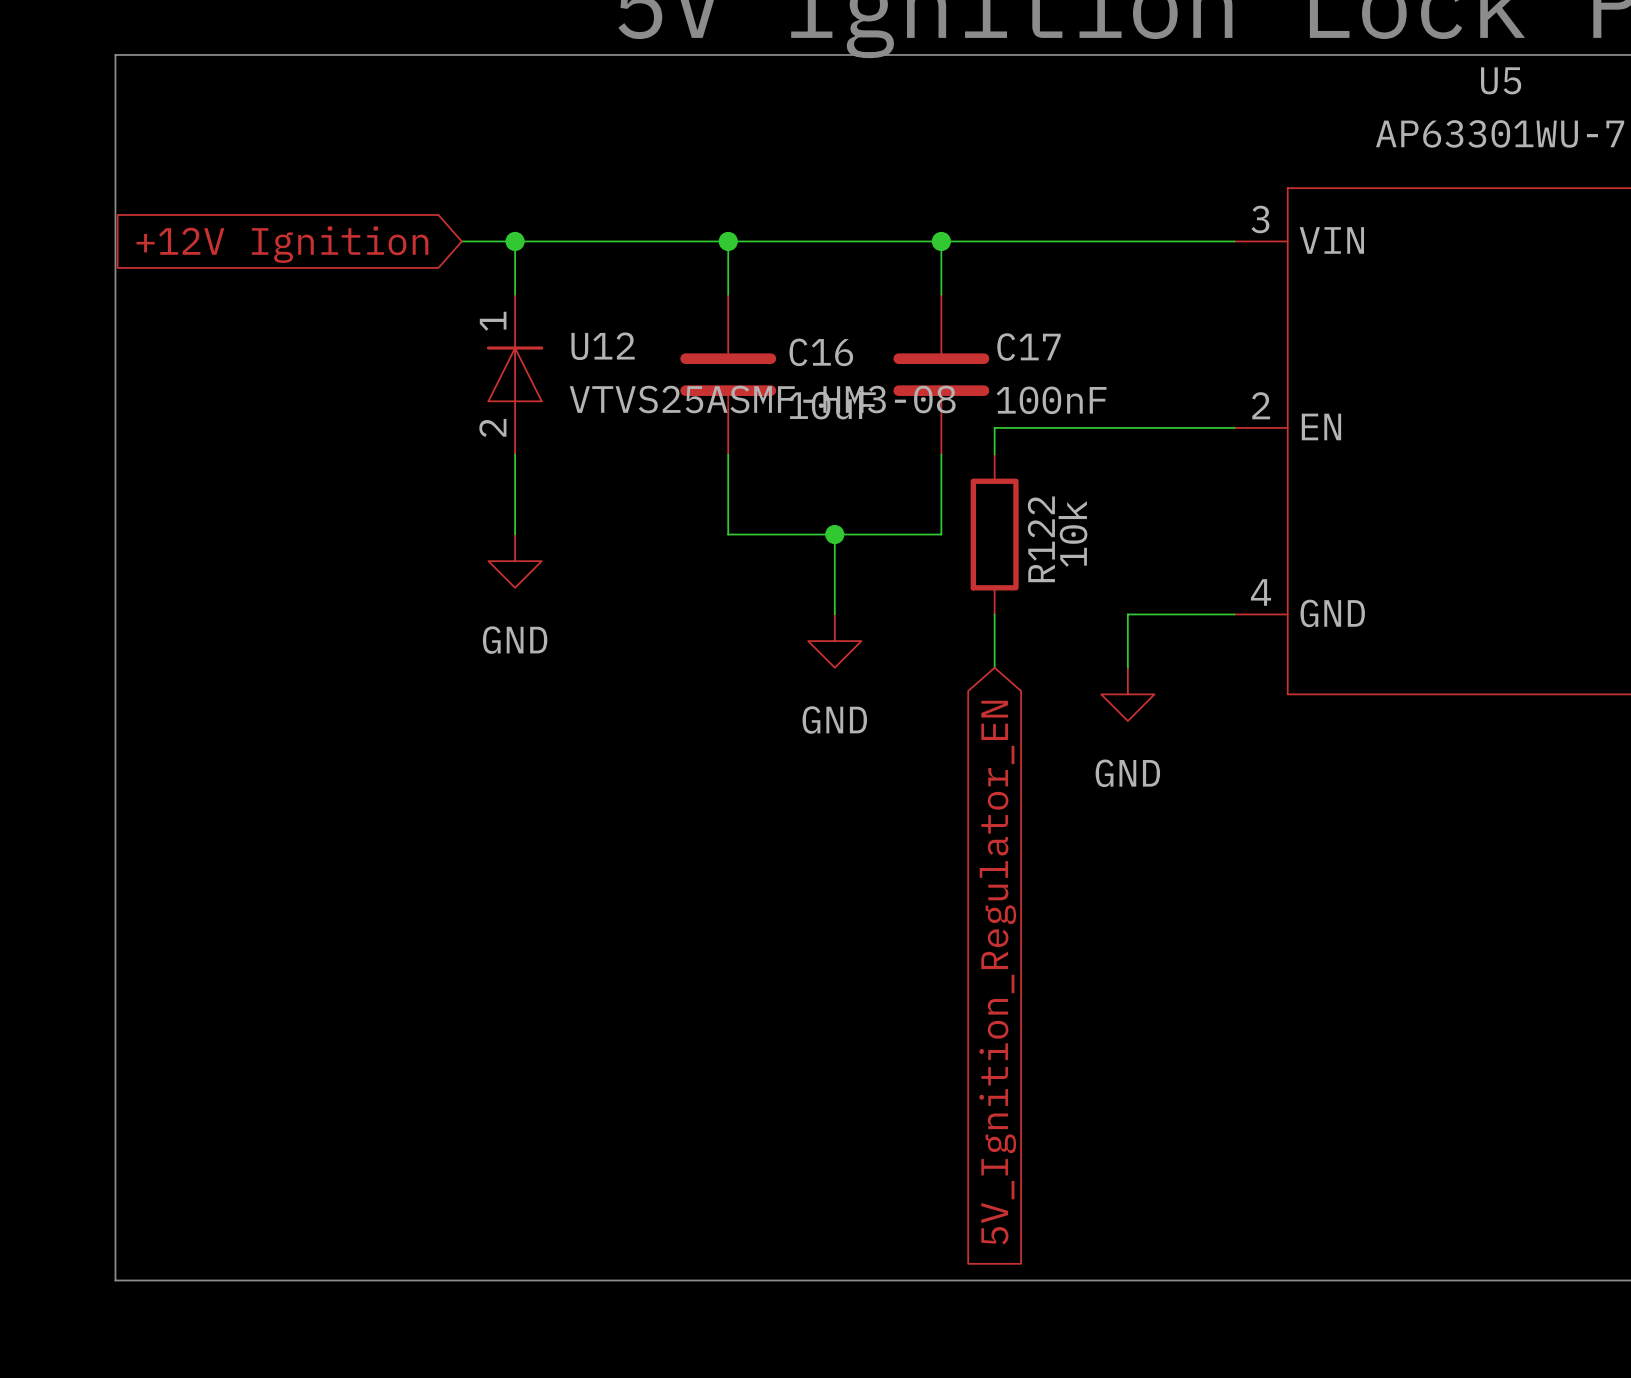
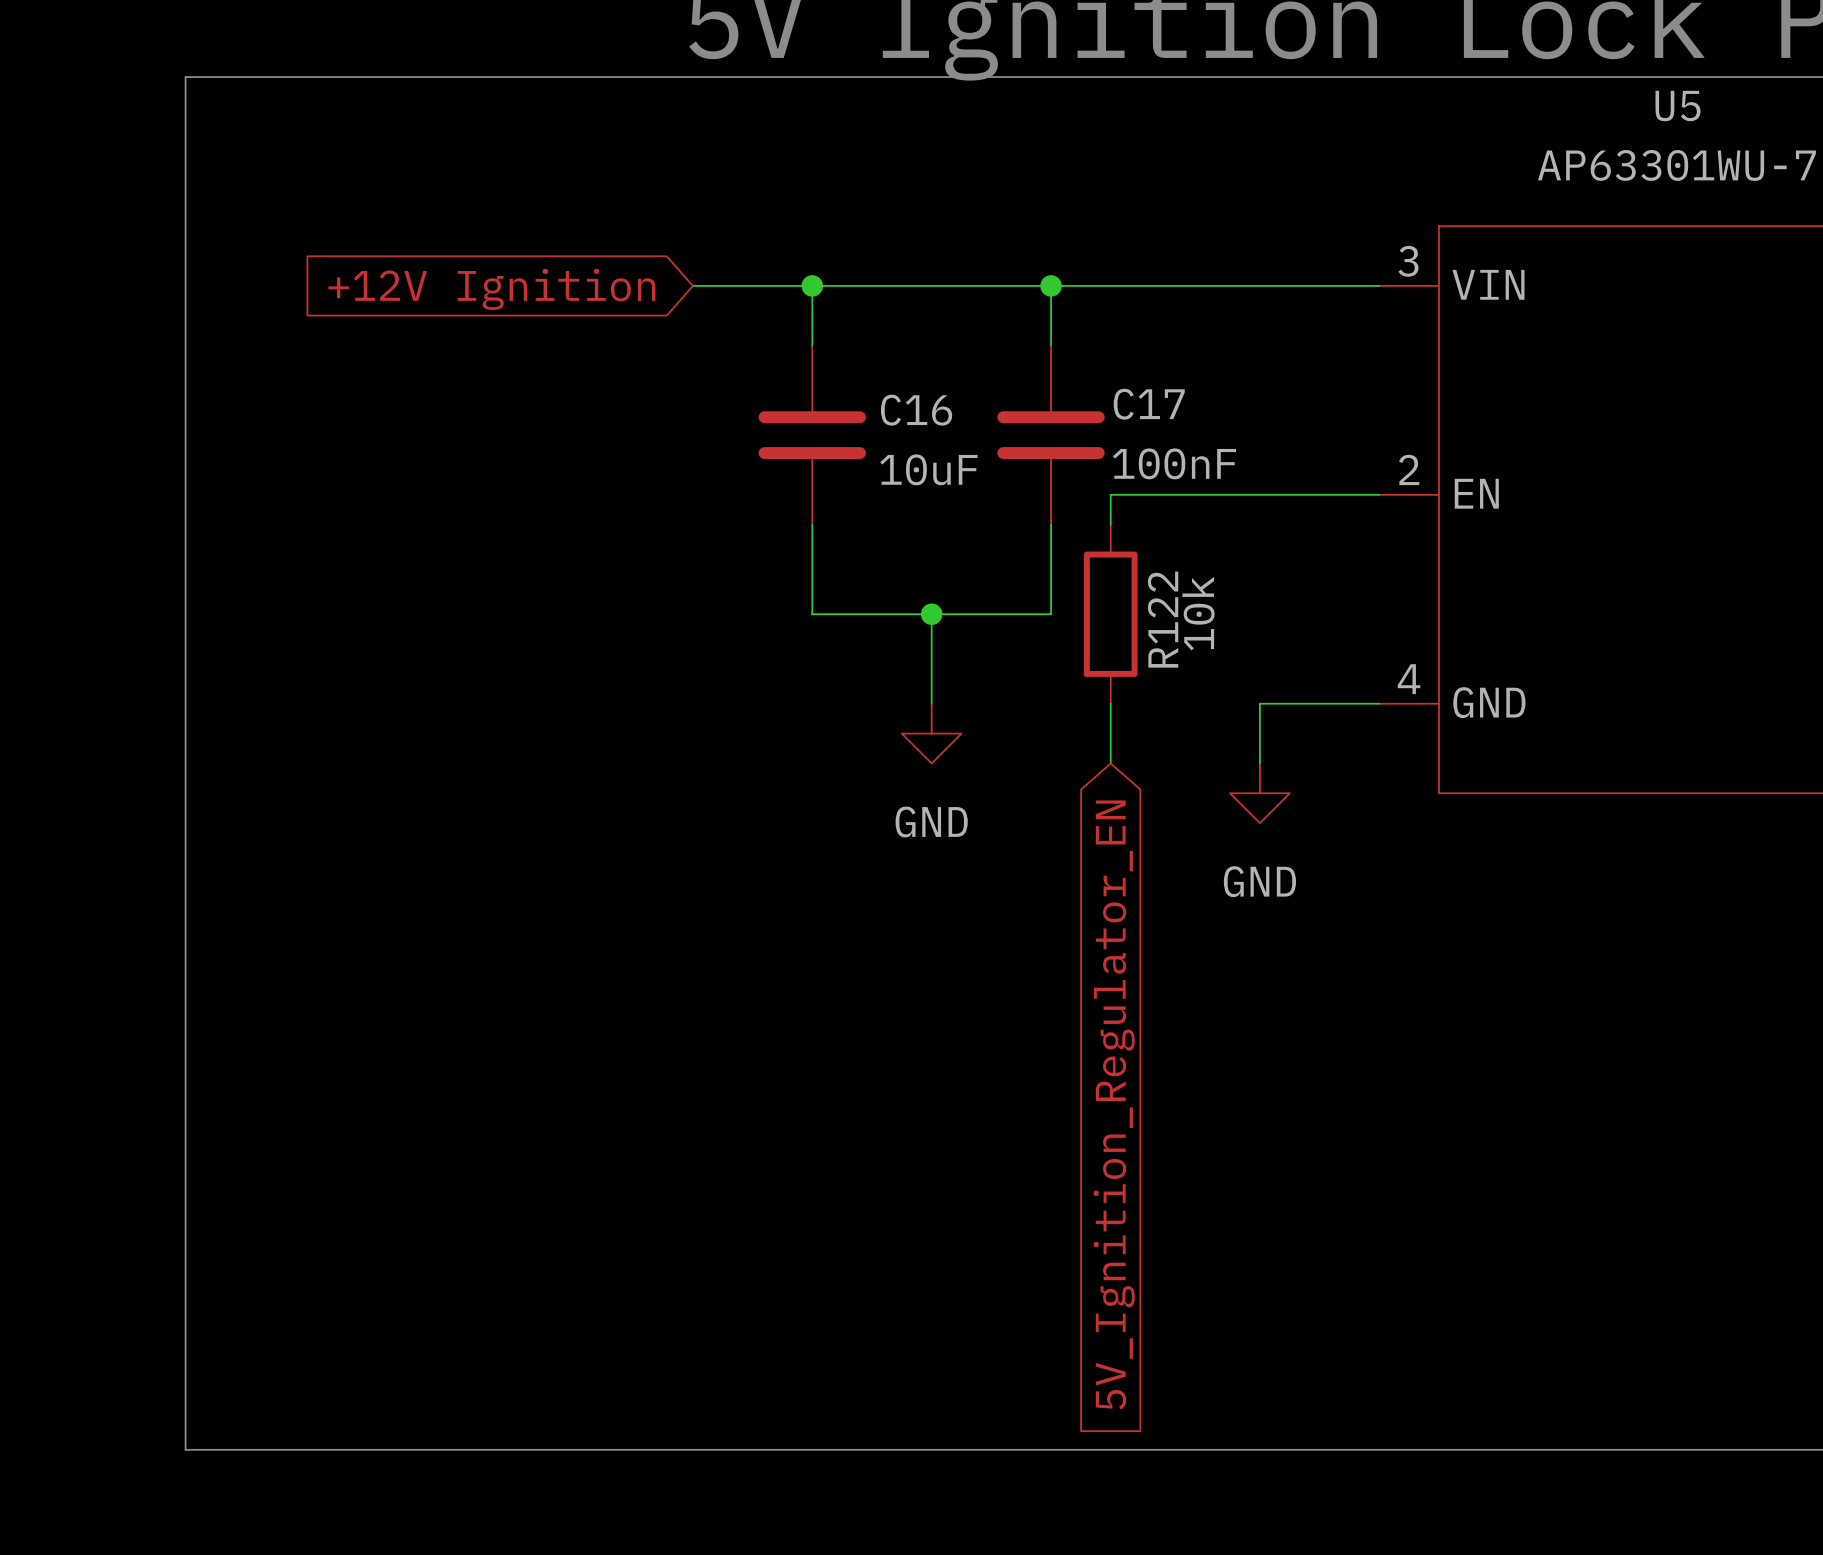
line: (168, 54) (115, 54) (115, 1280) (168, 1280) -> (185, 77) (185, 1449)
wire: (461, 241) (621, 241) -> none
wire: (515, 241) (515, 294) -> none
junction: (515, 241) -> none
global label position: +12V Ignition (282, 244) -> +12V Ignition (491, 289)
U12: VTVS25ASMF-HM3-08 (515, 374) -> none
wire: (515, 454) (515, 534) -> none
power symbol: GND (515, 561) -> none

